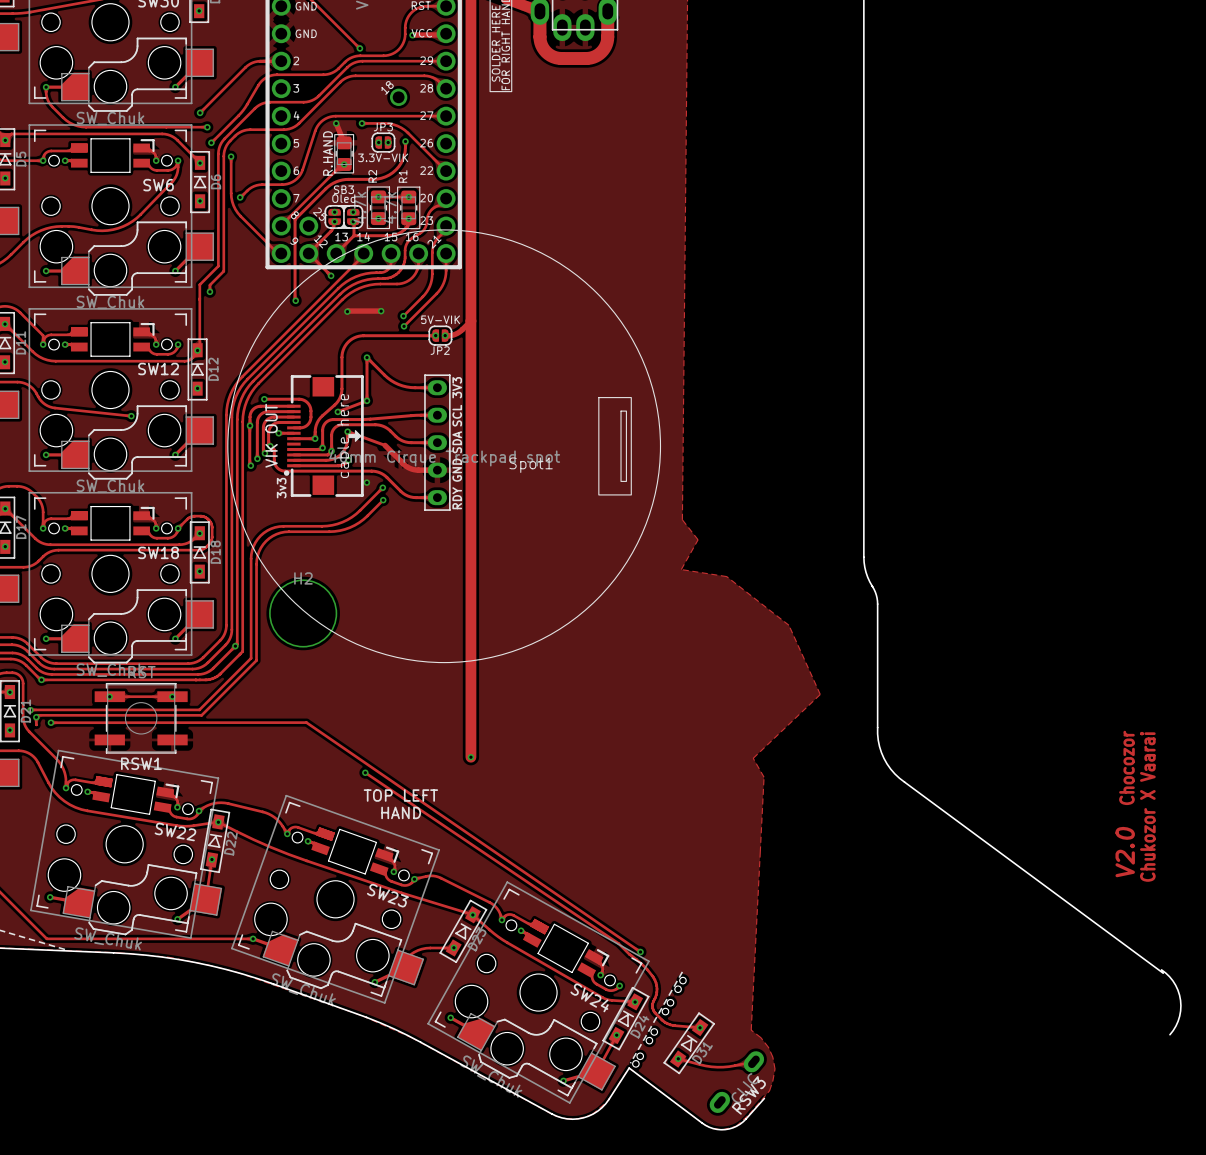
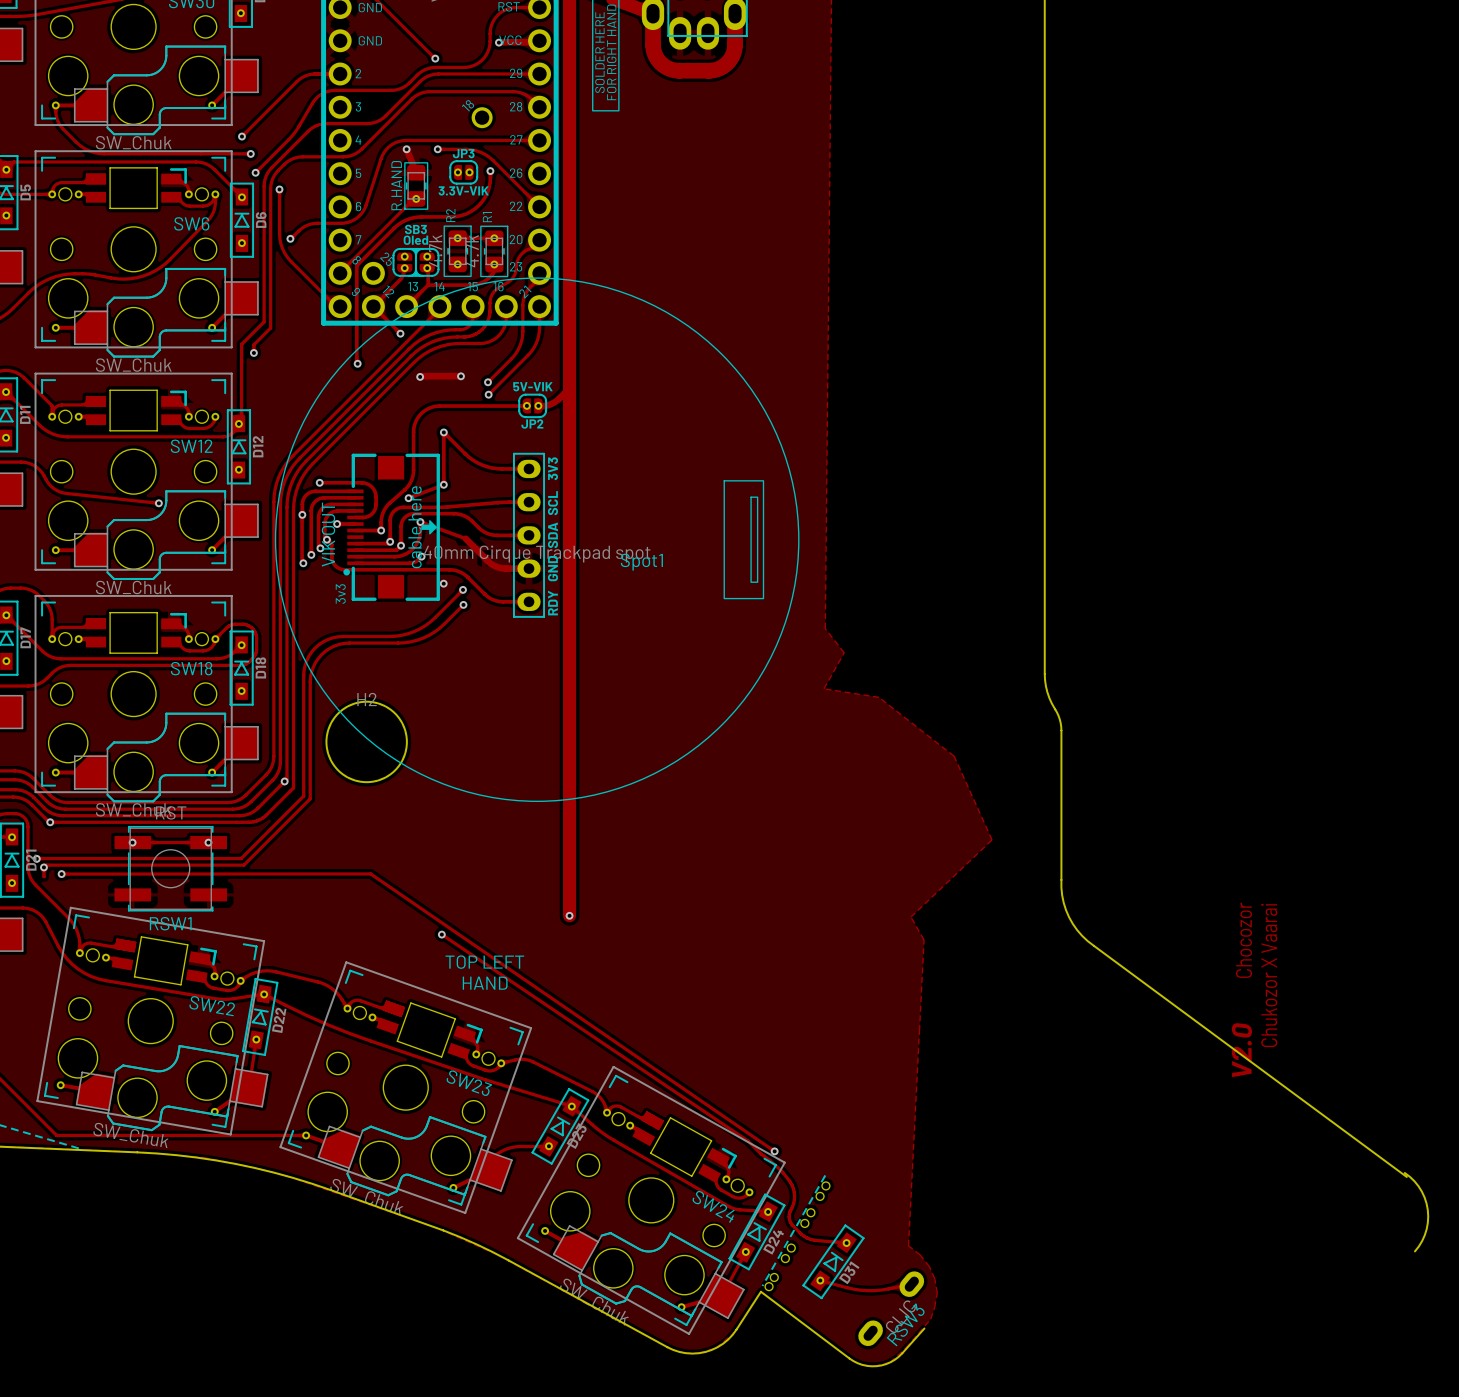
text position: Chocozor (1126, 767) -> Chocozor (1244, 940)
text position: Chukozor X Vaarai (1147, 806) -> Chukozor X Vaarai (1269, 975)
text position: V2.0 (1125, 852) -> V2.0 (1241, 1049)

